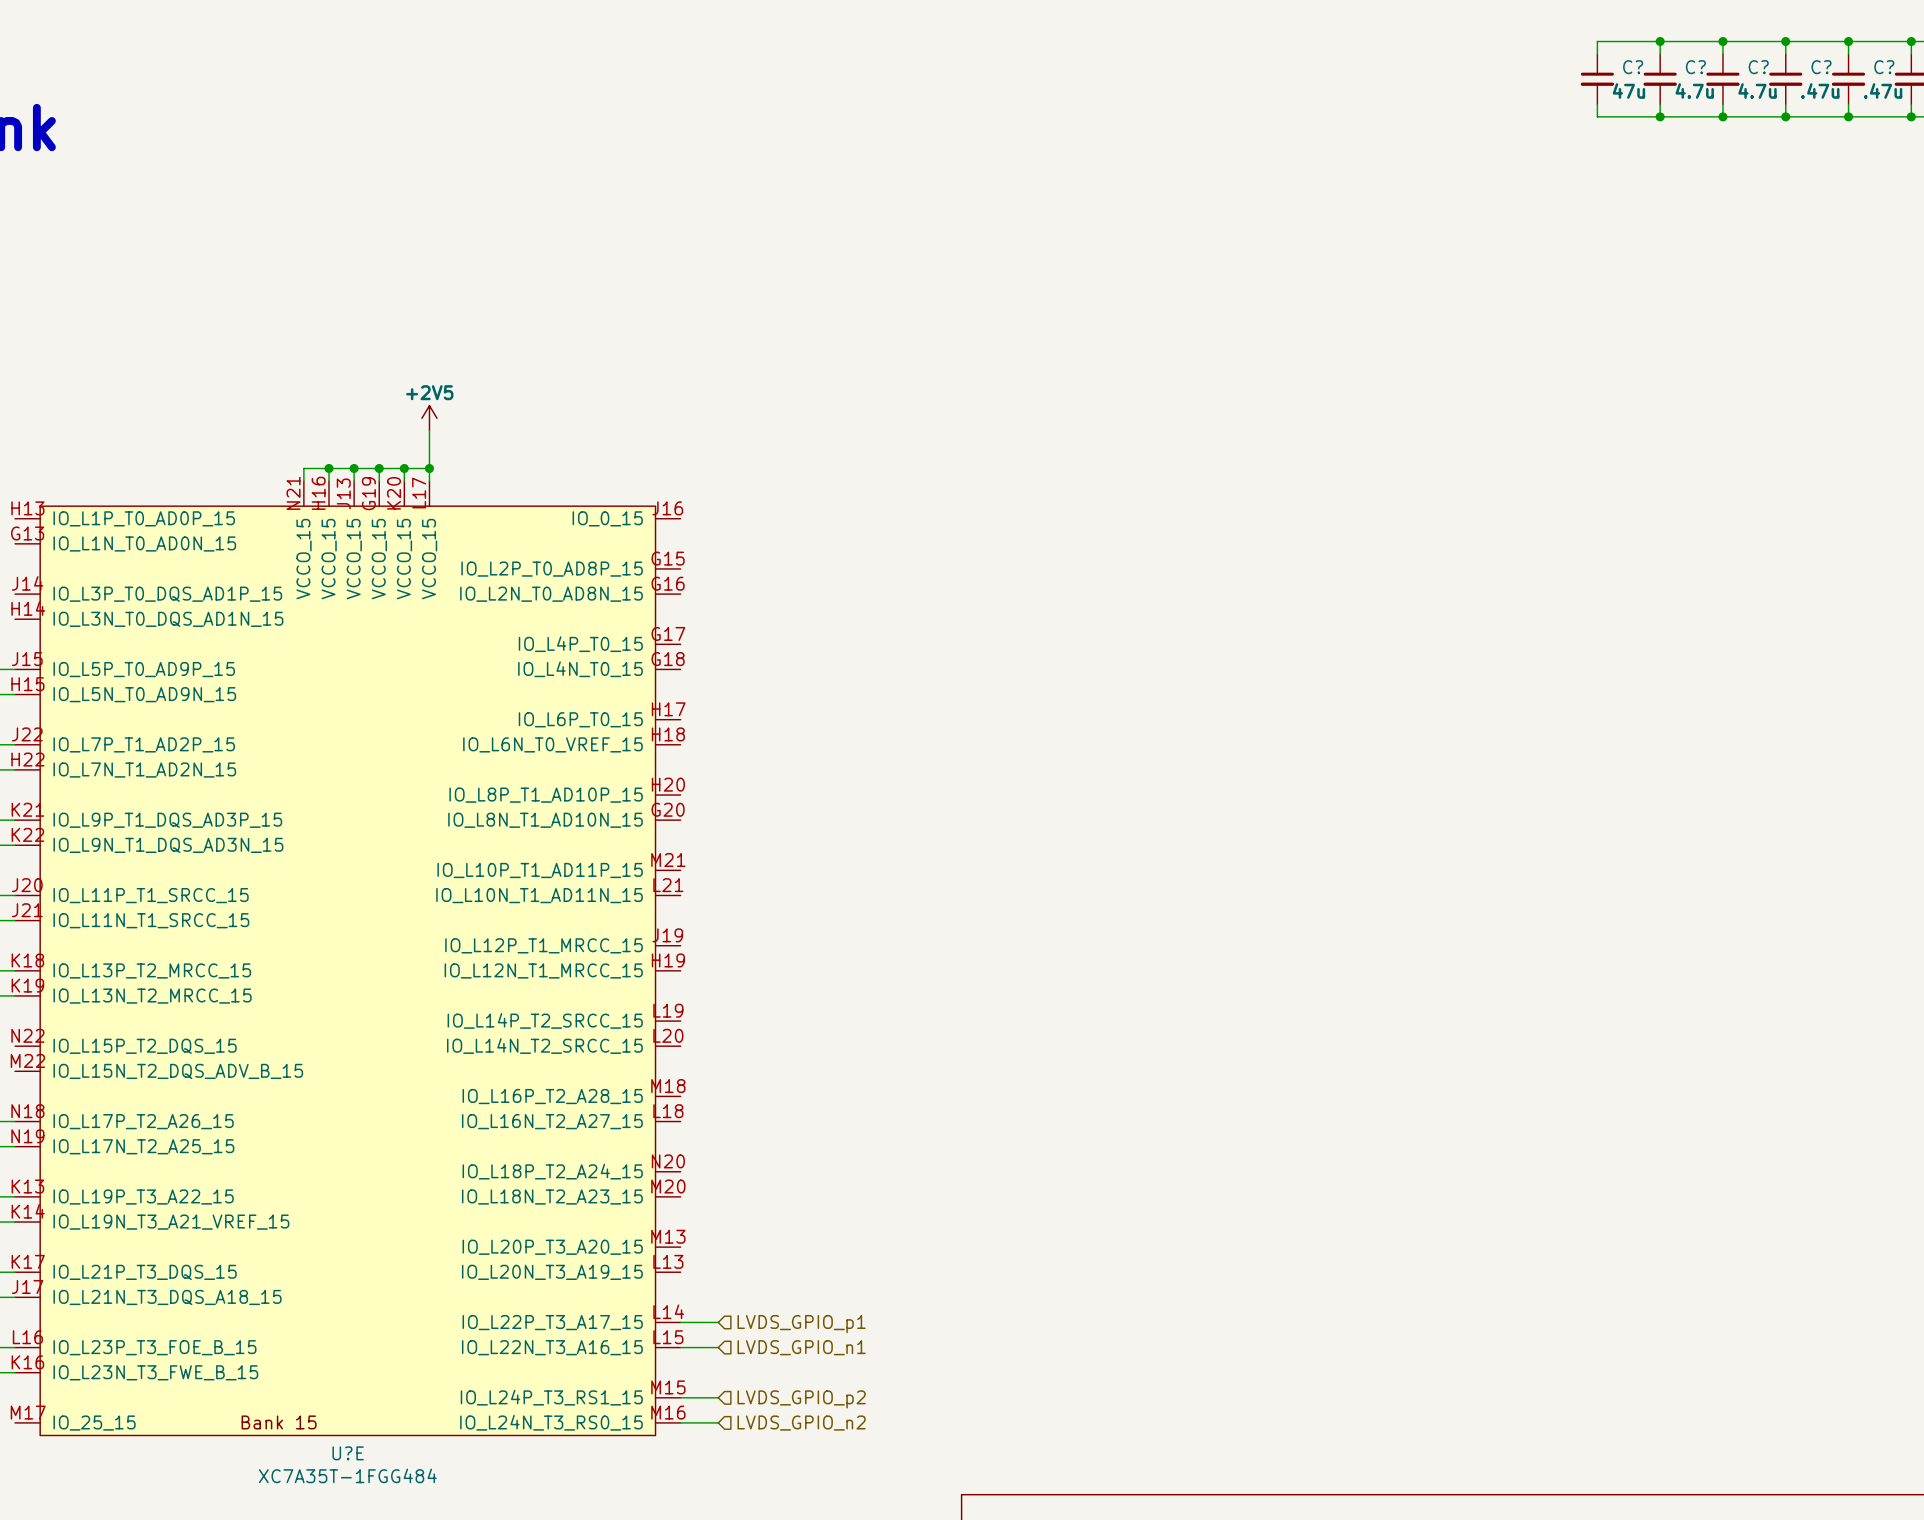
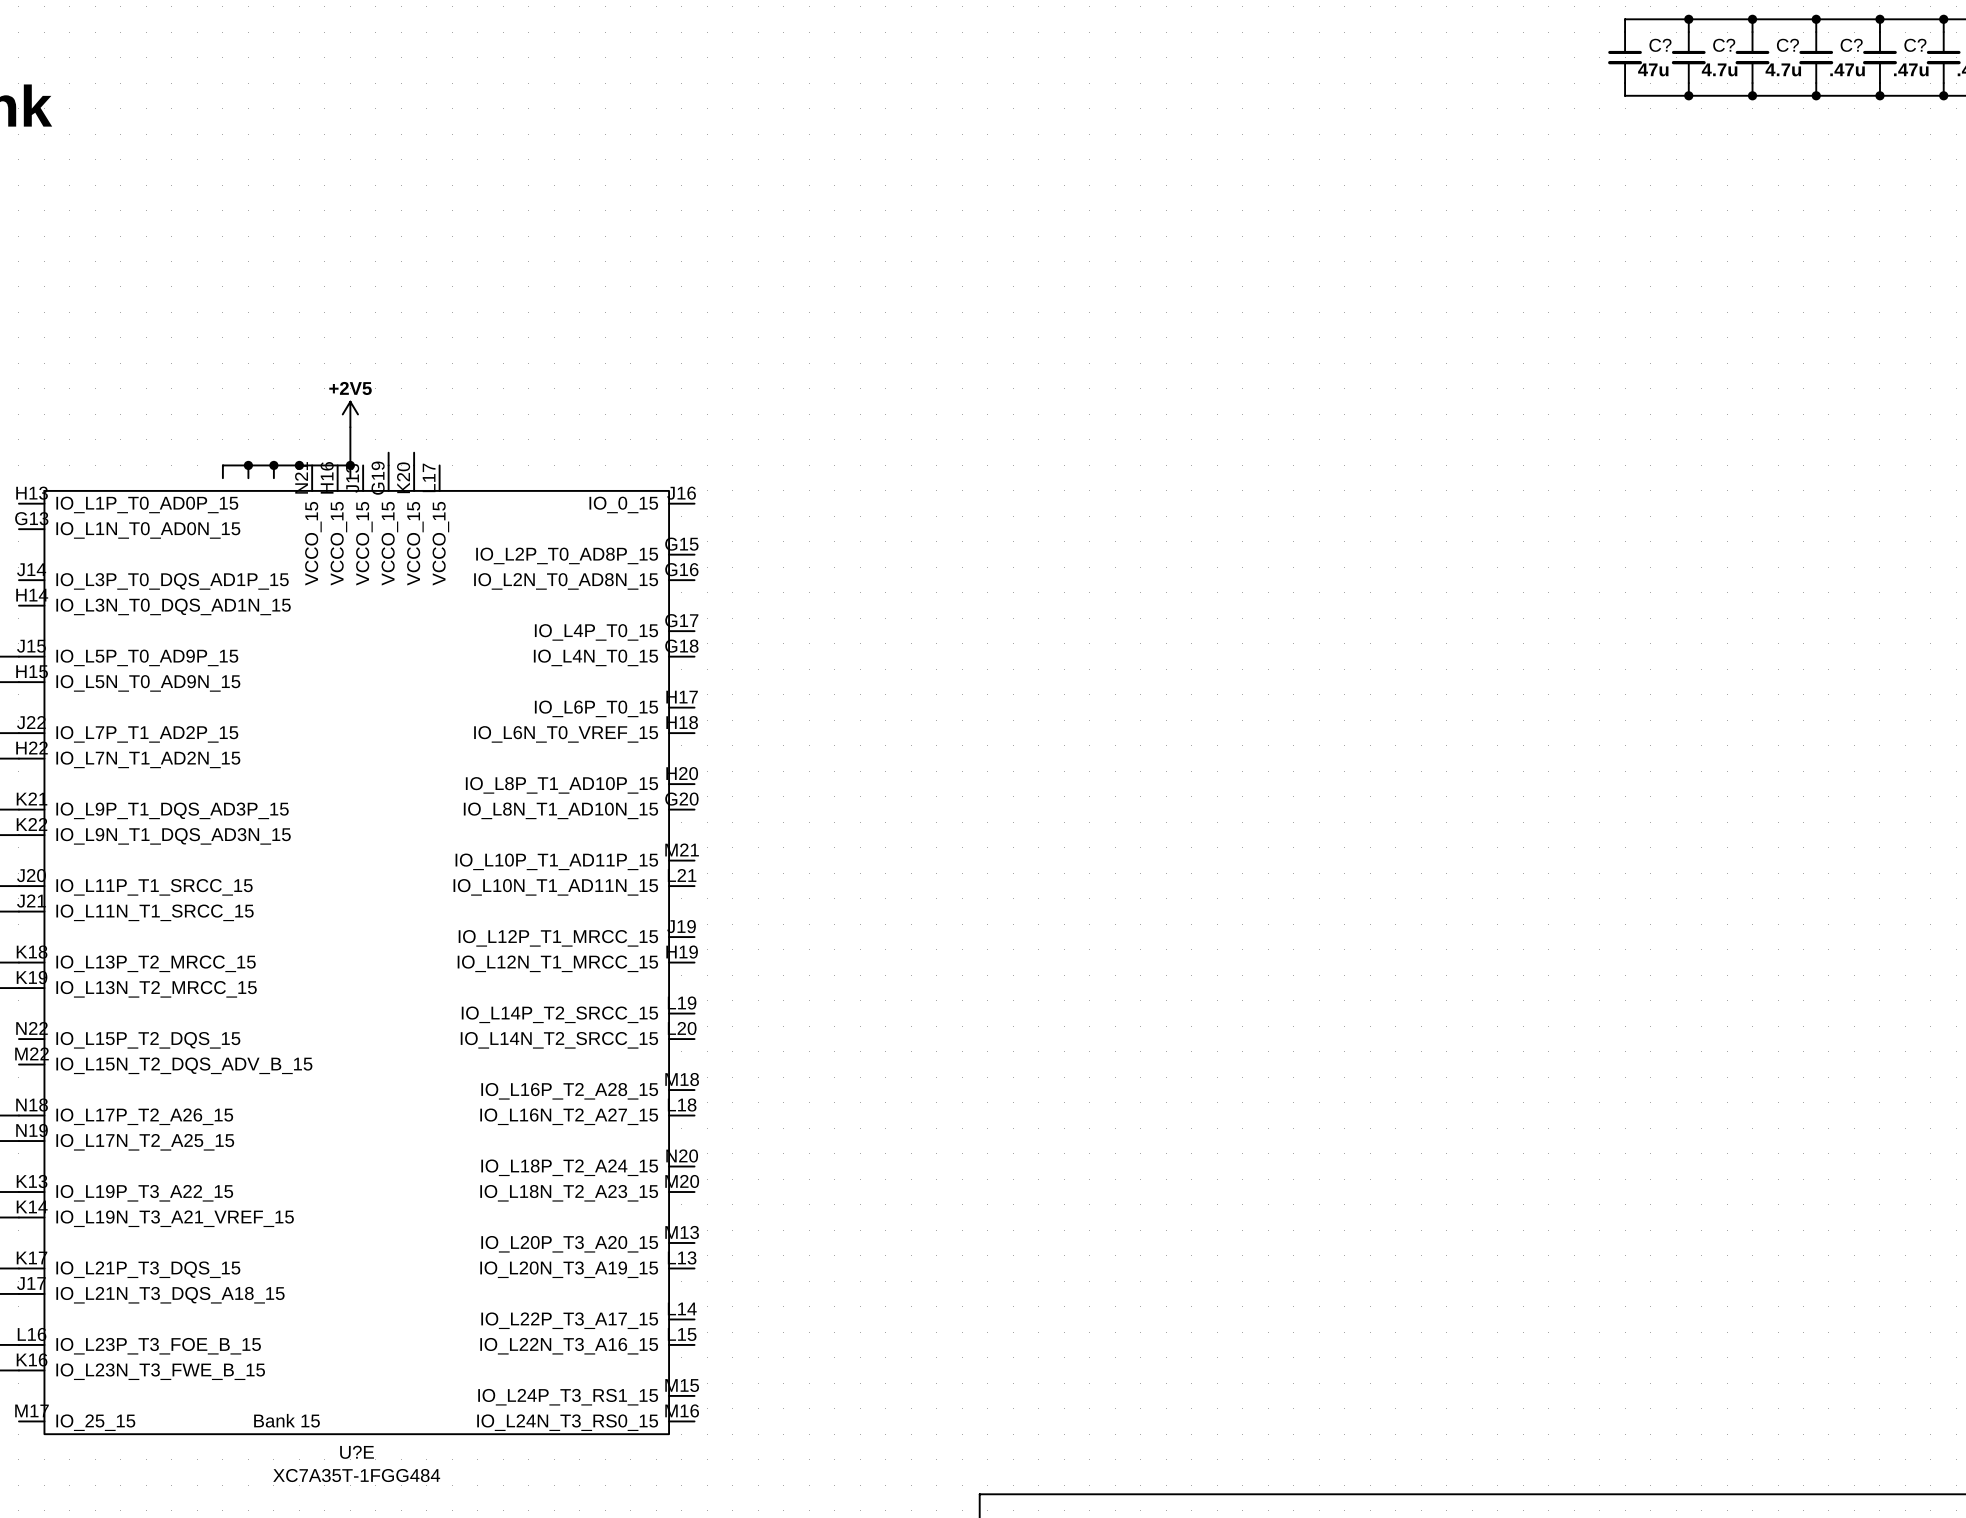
power symbol position: +2V5 (429, 418) -> +2V5 (350, 414)
wire: (429, 430) (429, 481) -> (350, 427) (350, 478)
wire: (329, 468) (329, 481) -> (248, 465) (248, 478)
junction: (329, 468) -> none
wire: (354, 468) (354, 481) -> (273, 465) (273, 478)
junction: (354, 468) -> none
junction: (379, 468) -> none
junction: (404, 468) -> none
wire: (429, 468) (303, 468) (303, 481) -> (350, 465) (222, 465) (222, 478)
junction: (429, 468) -> none
junction: none -> (248, 465)
junction: none -> (273, 465)
junction: none -> (299, 465)
junction: none -> (350, 465)
wire: (680, 1322) (718, 1322) -> none
hierarchical label: LVDS_GPIO_p1 (801, 1324) -> none
wire: (680, 1347) (718, 1347) -> none
hierarchical label: LVDS_GPIO_n1 (801, 1347) -> none
wire: (680, 1397) (718, 1397) -> none
hierarchical label: LVDS_GPIO_p2 (801, 1399) -> none
wire: (680, 1422) (718, 1422) -> none
hierarchical label: LVDS_GPIO_n2 (801, 1423) -> none

